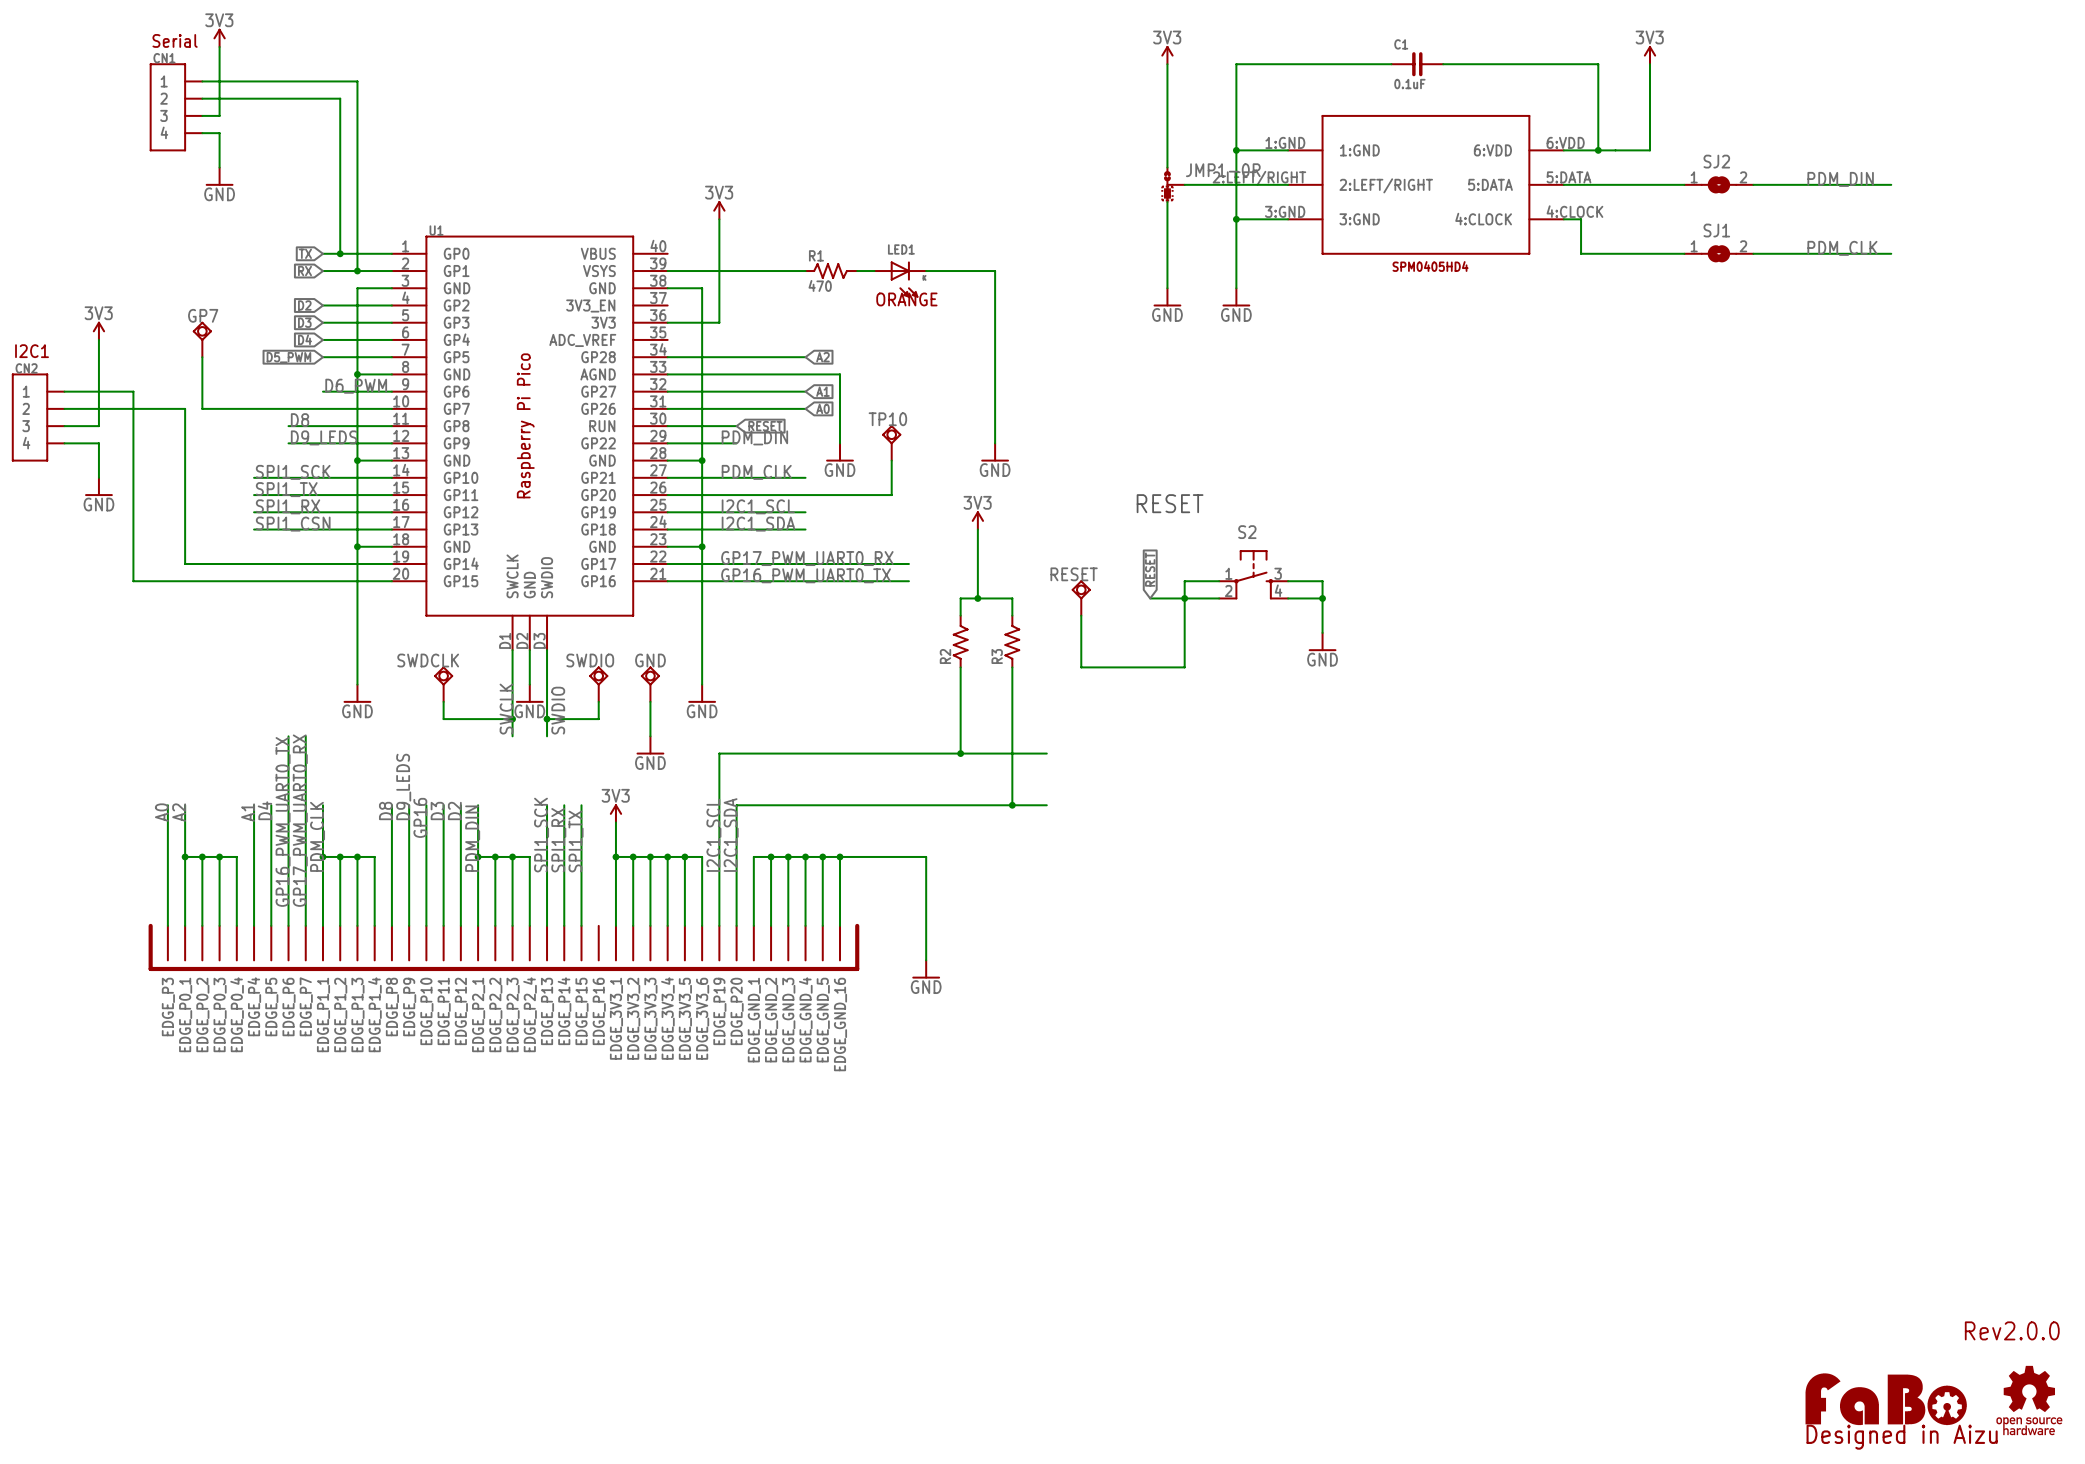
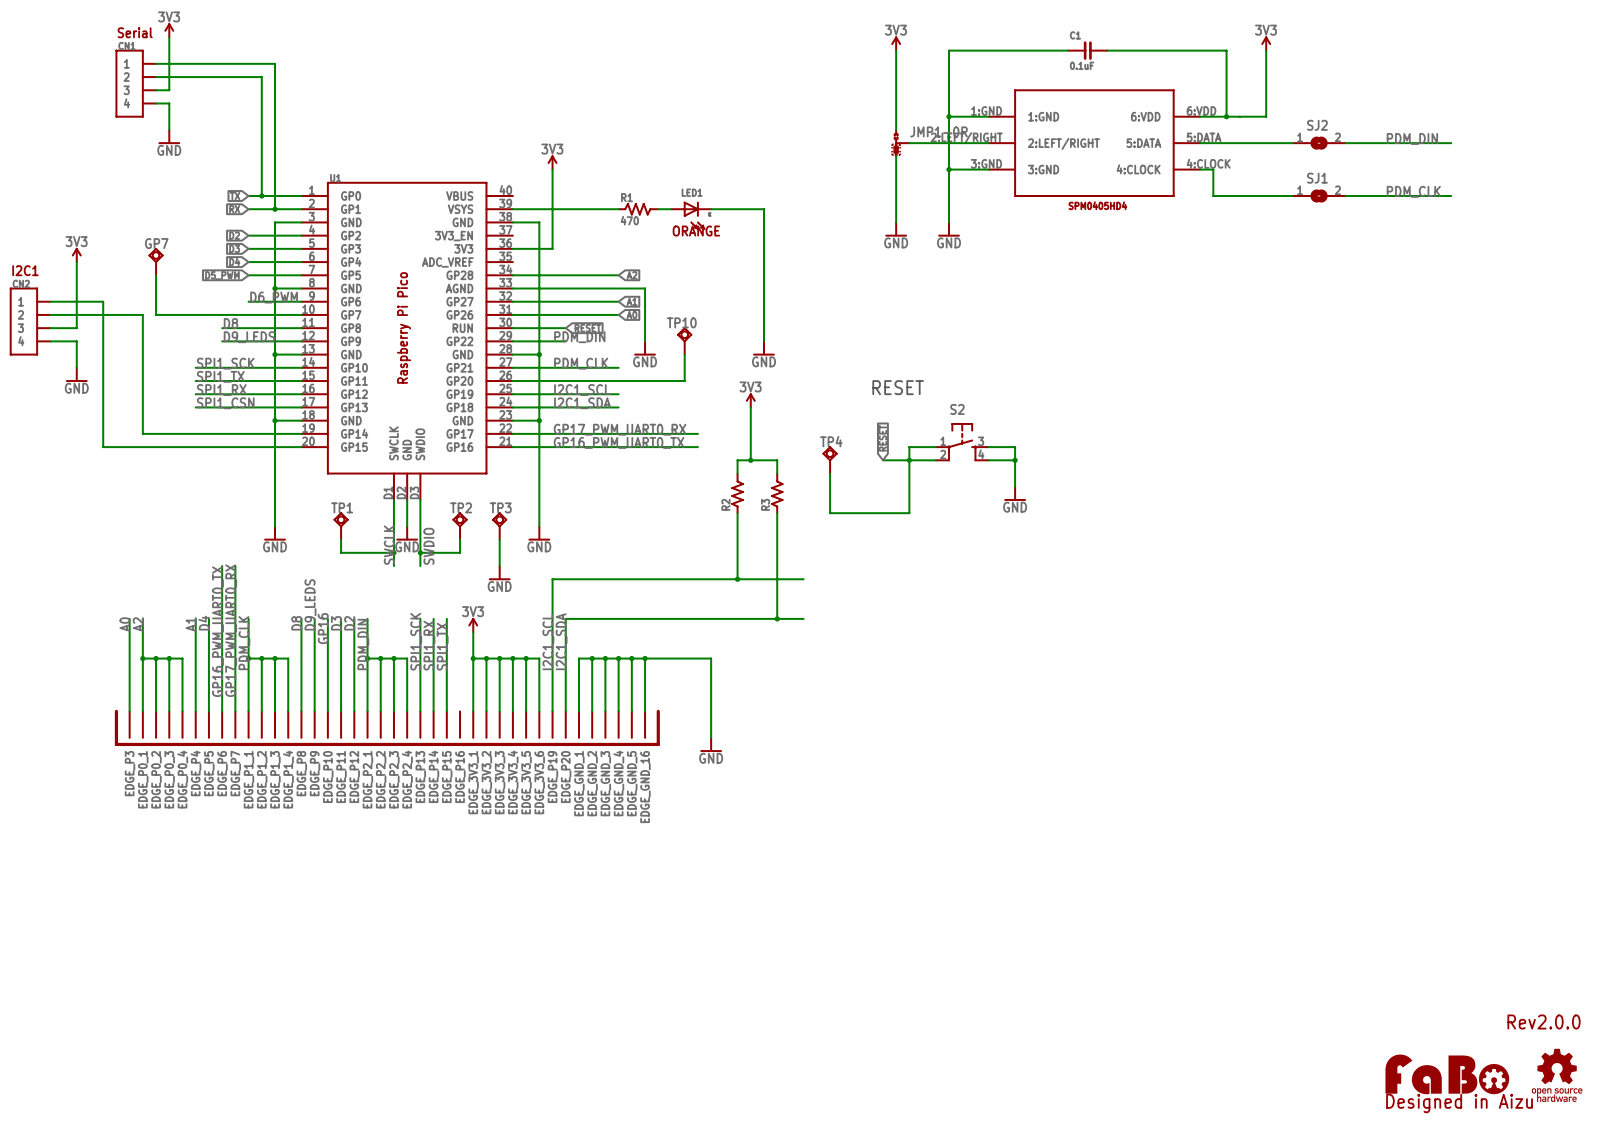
RESET name: RESET (1074, 574) -> TP4 (831, 441)
SWDCLK name: SWDCLK (428, 660) -> TP1 (342, 507)
SWDIO name: SWDIO (590, 660) -> TP2 (461, 507)
GND name: GND (650, 660) -> TP3 (500, 507)

